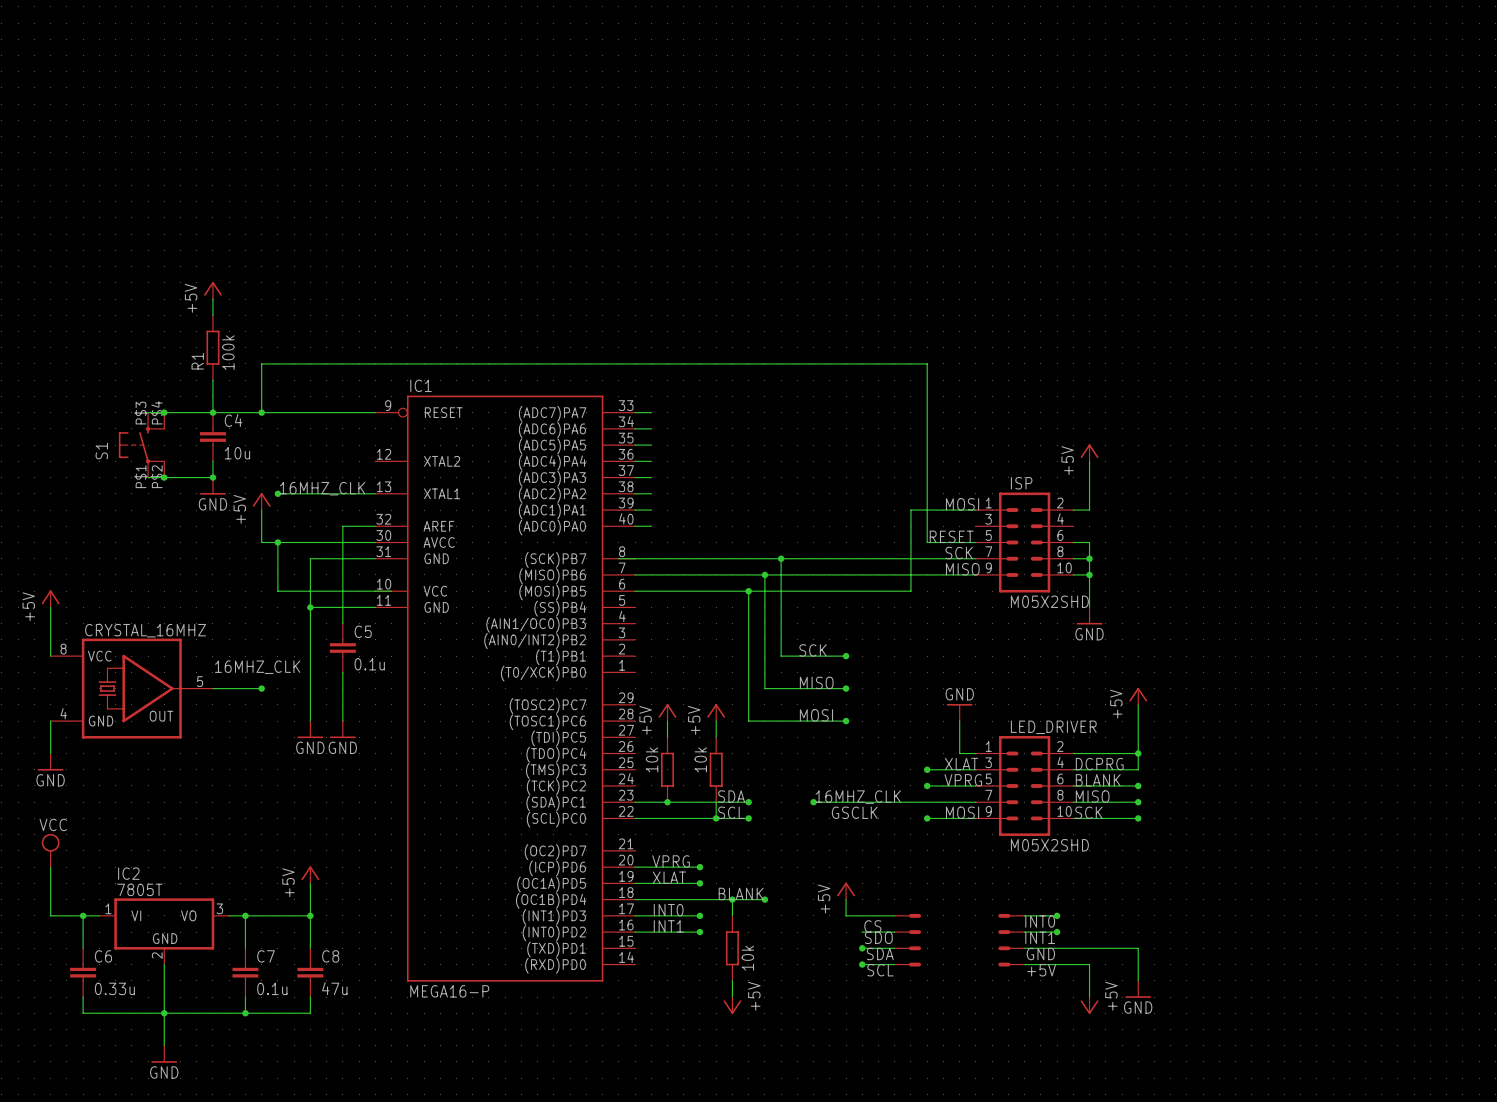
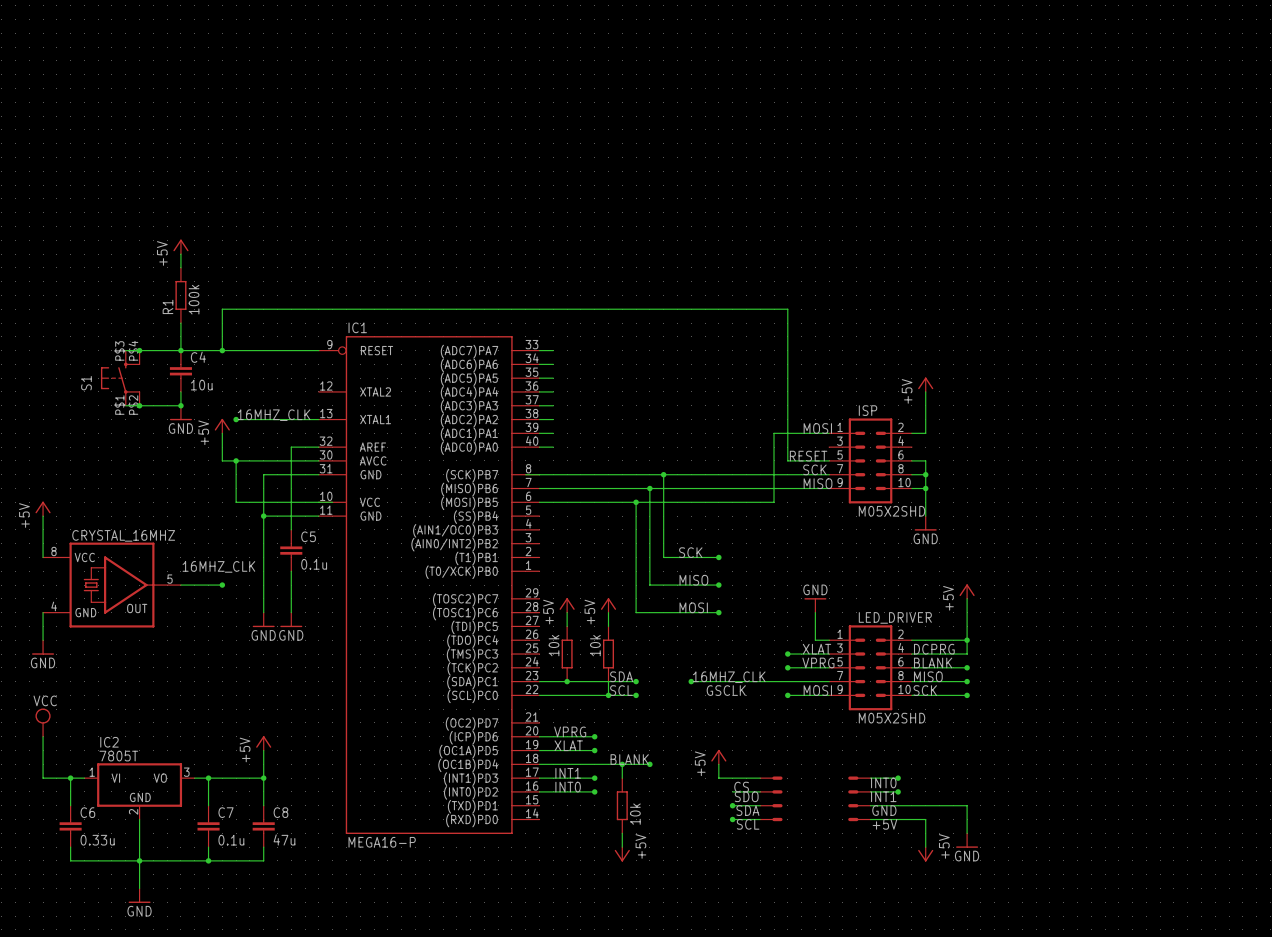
label: INT0 (668, 910) -> INT1 (568, 773)
label: INT1 (668, 926) -> INT0 (568, 787)

